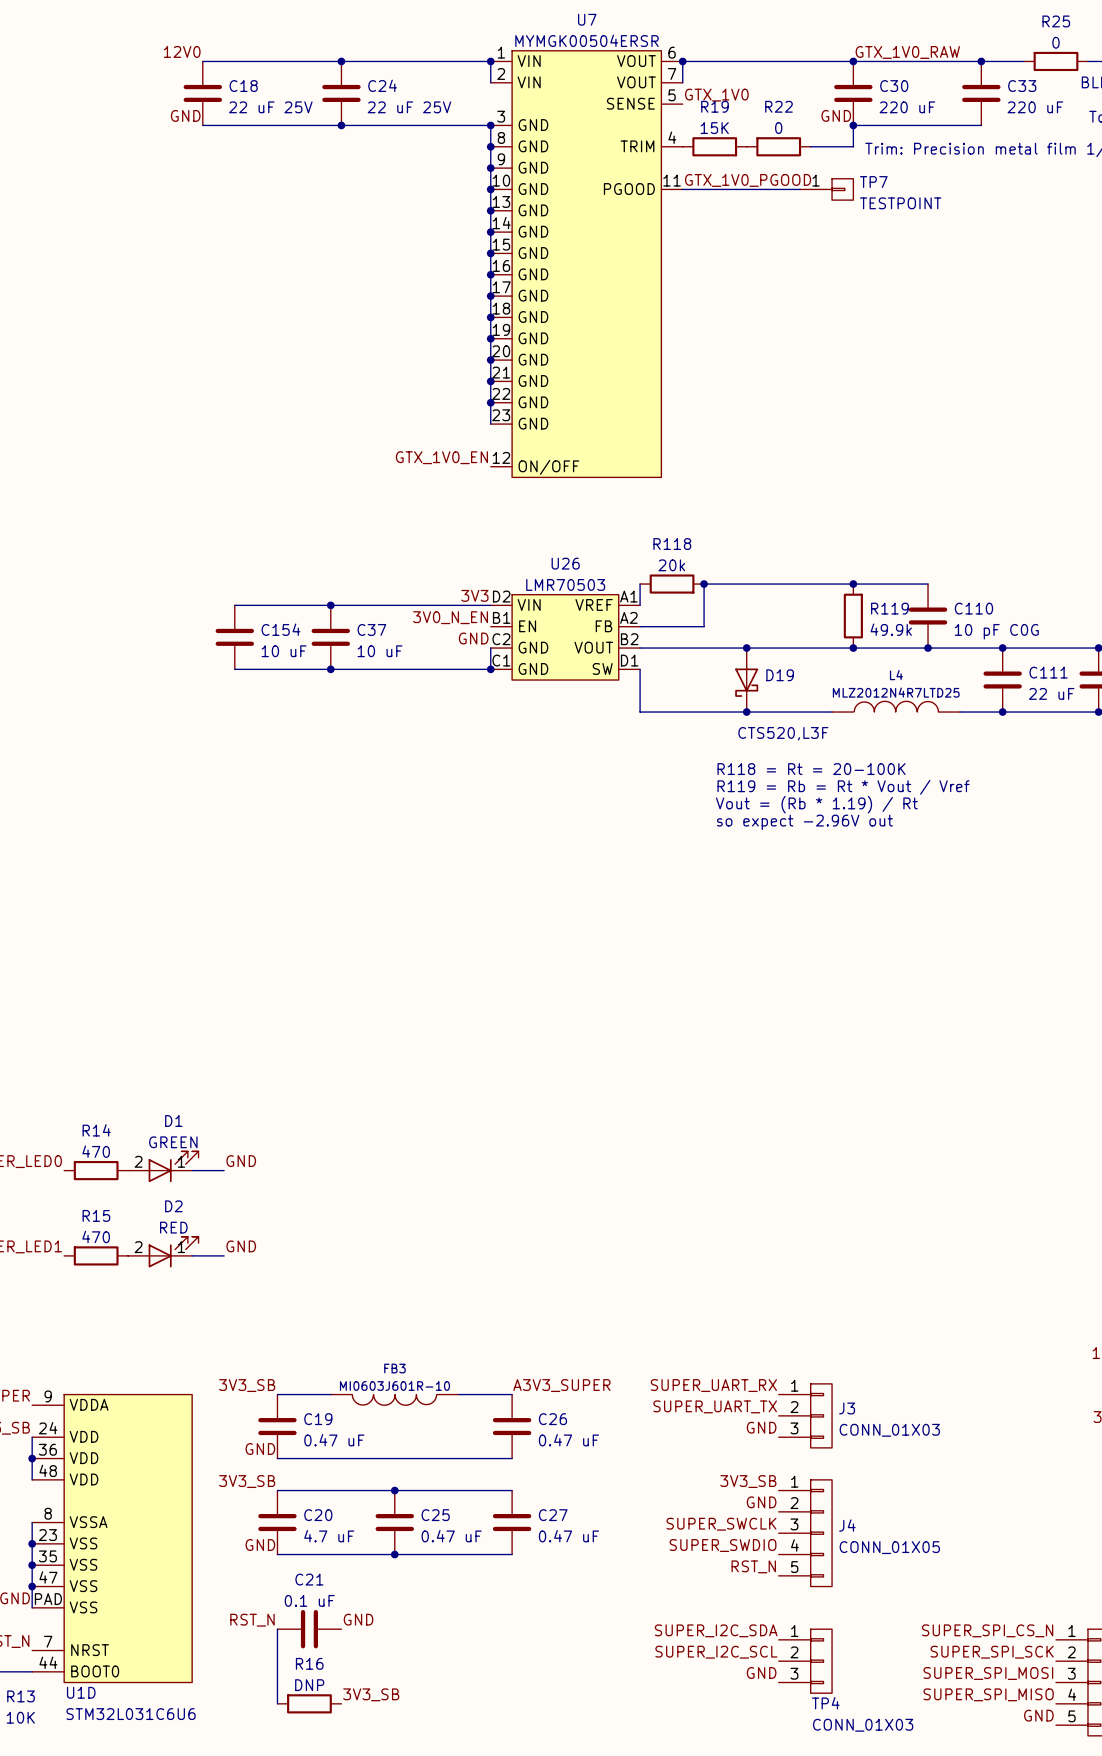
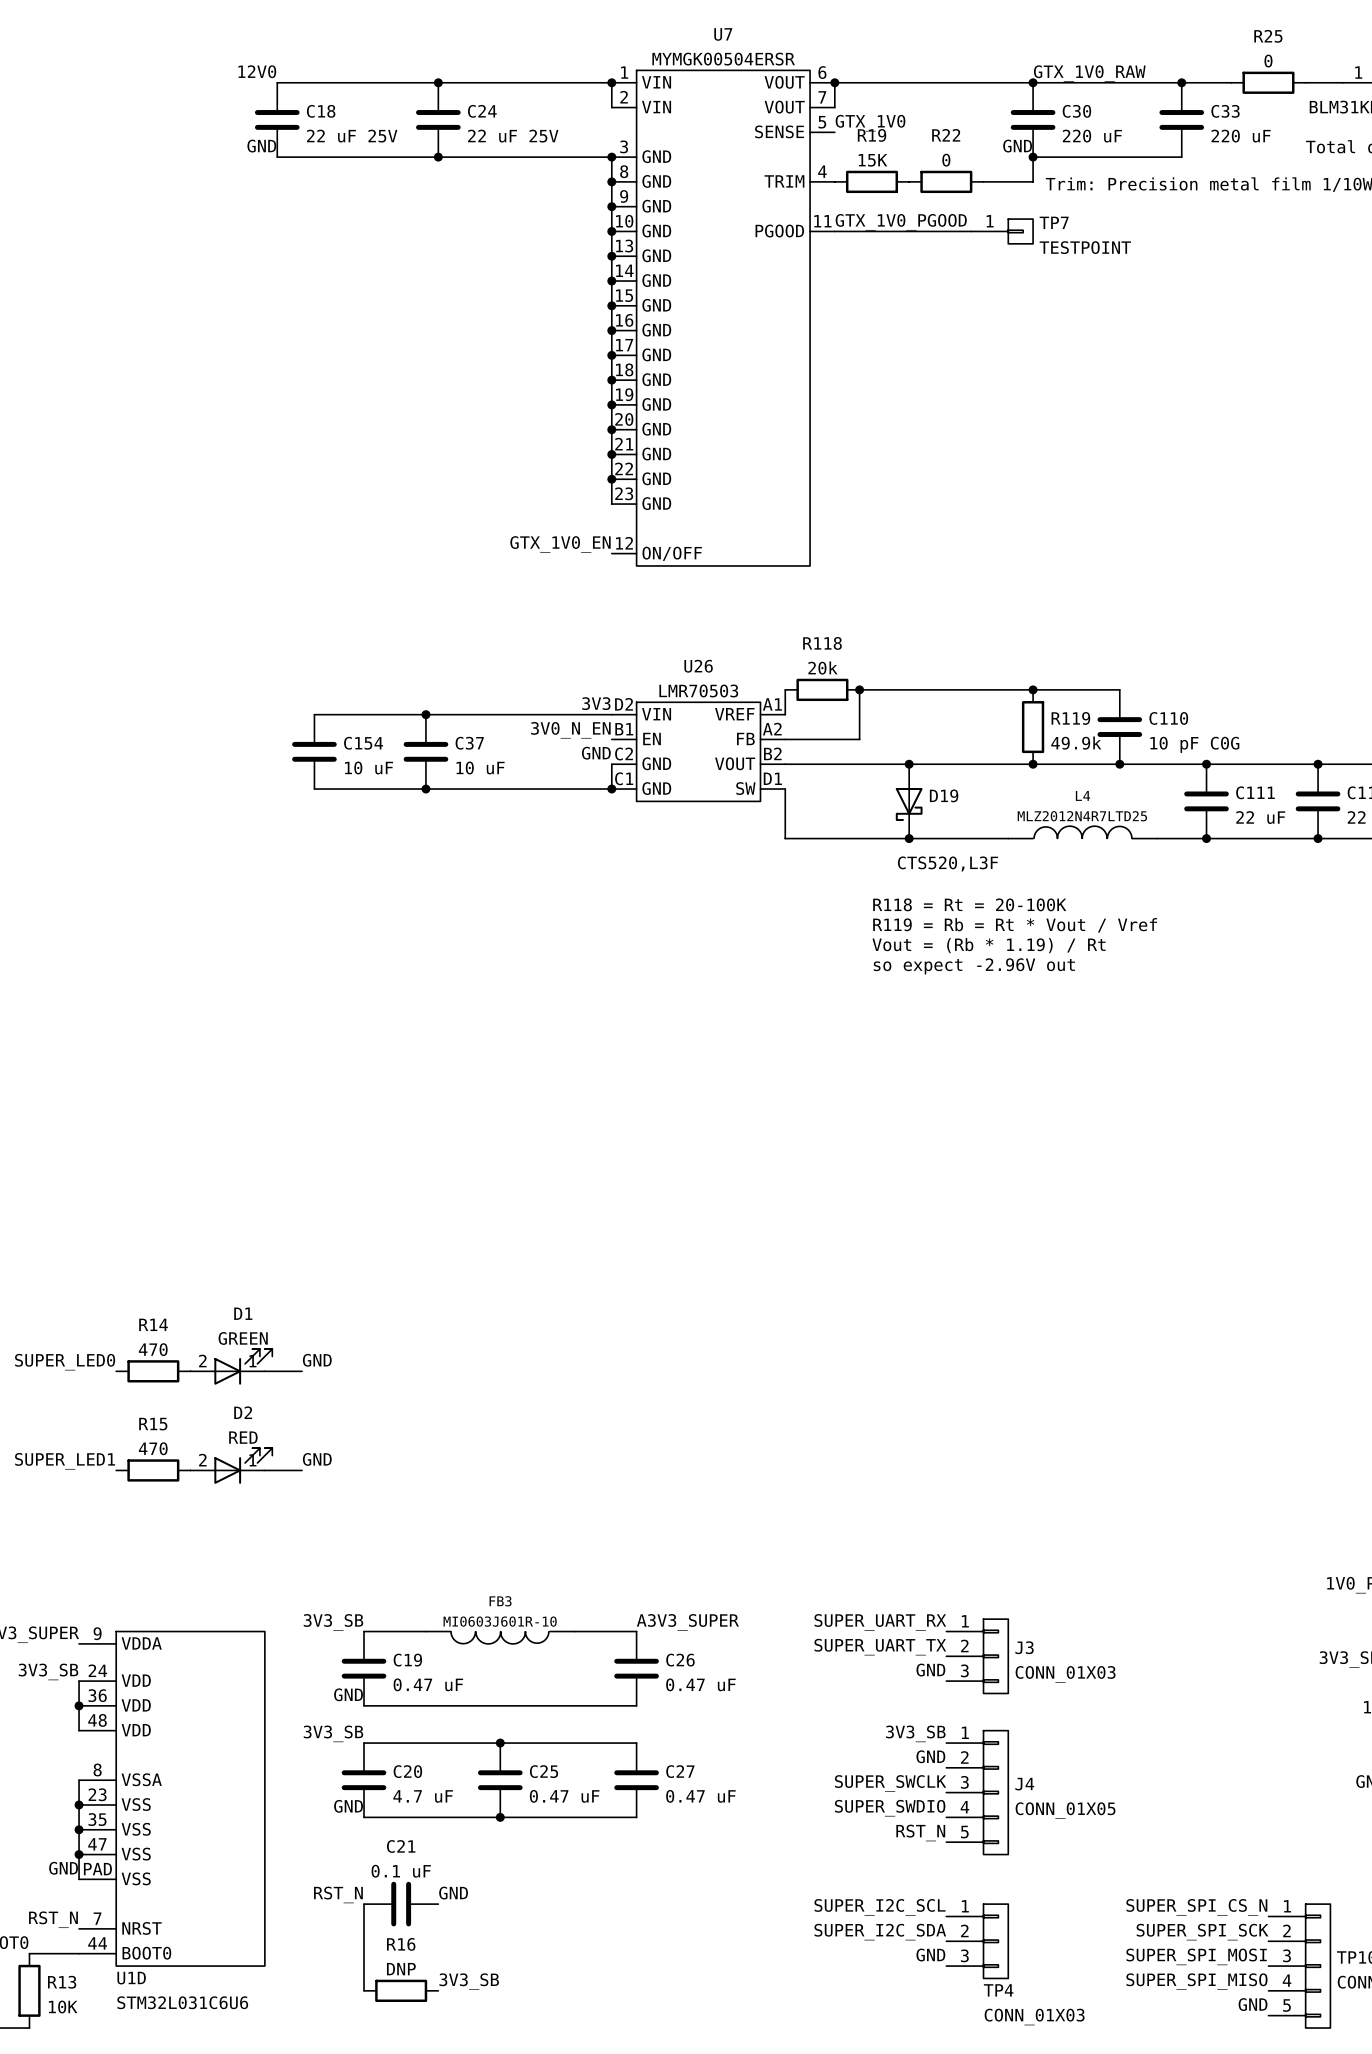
label: SUPER_I2C_SDA (716, 1630) -> SUPER_I2C_SCL (880, 1907)
label: SUPER_I2C_SCL (716, 1652) -> SUPER_I2C_SDA (880, 1932)

